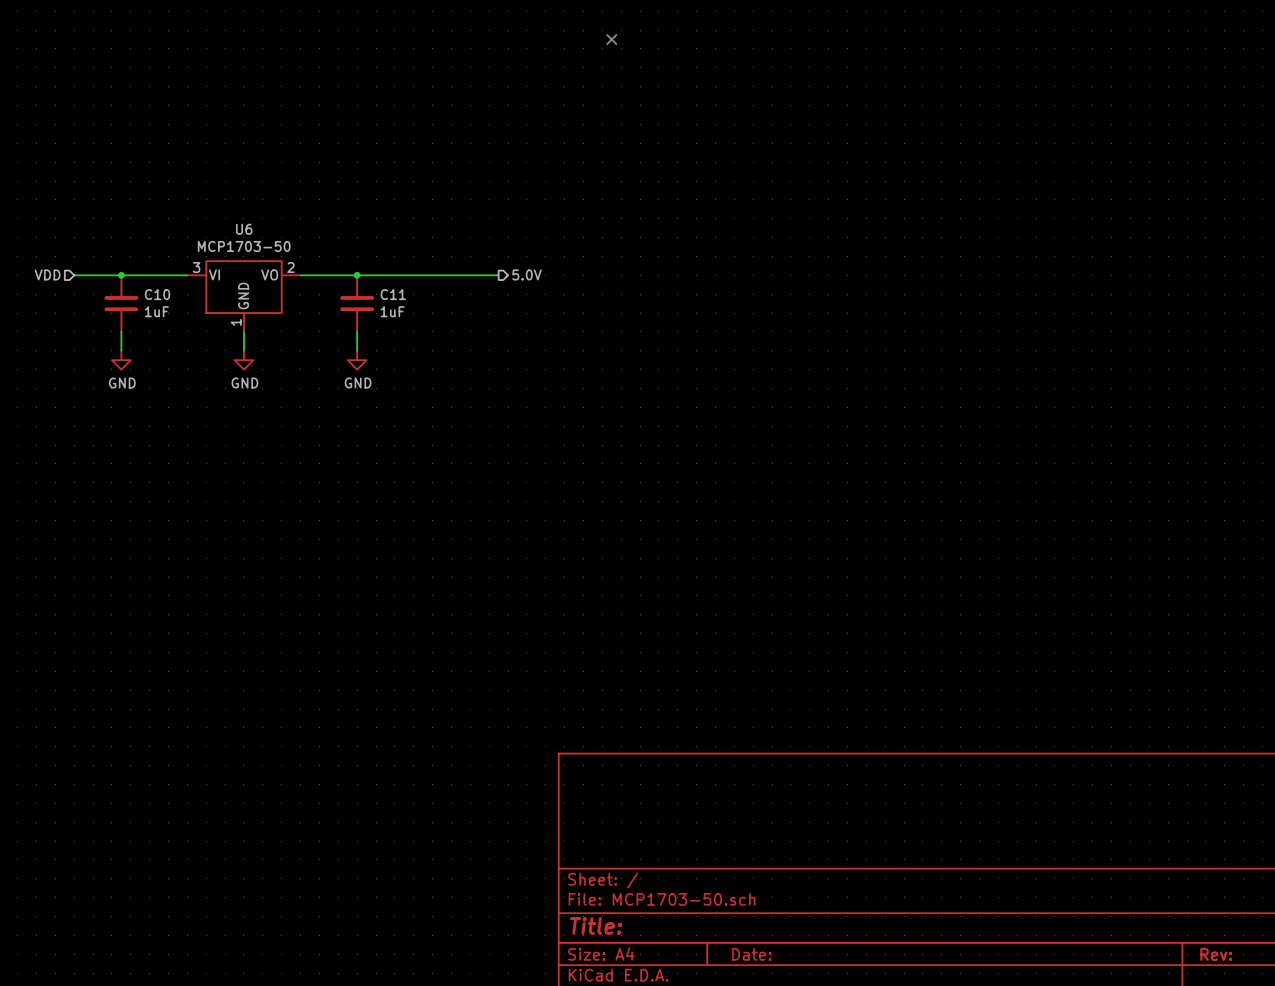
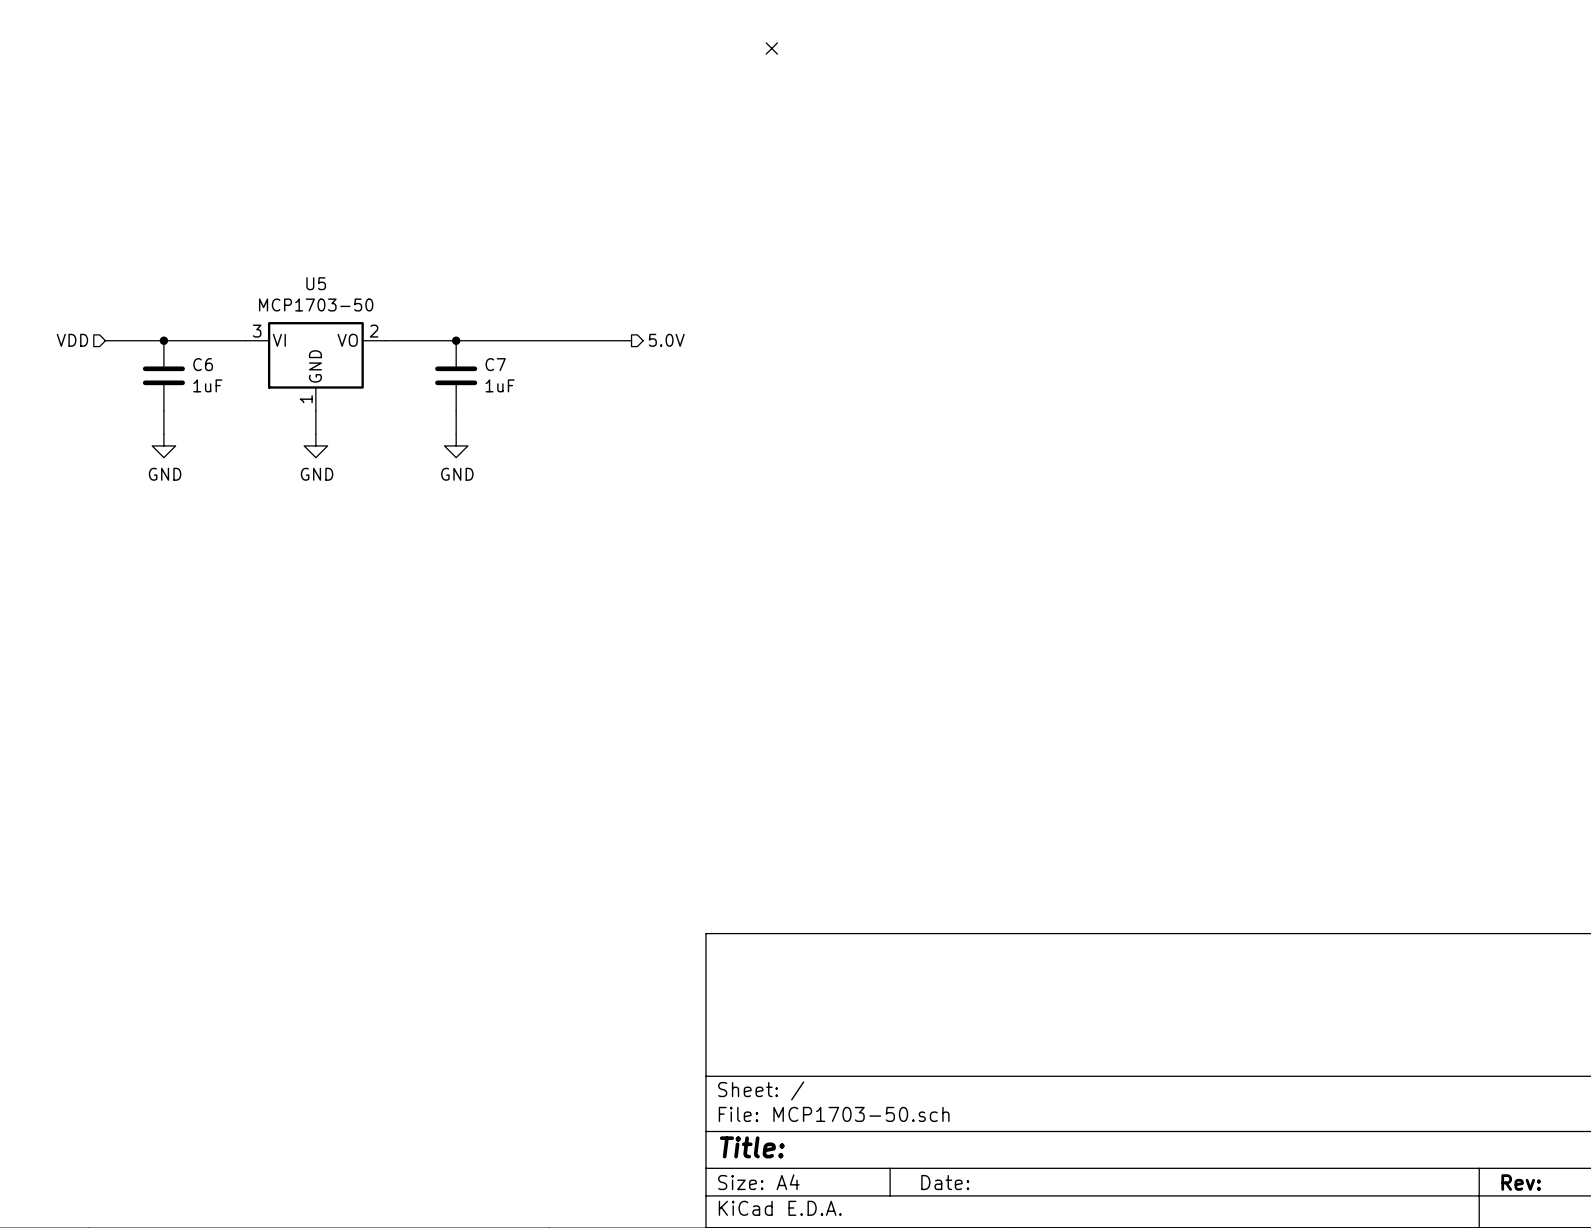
U6 name: U6 (244, 229) -> U5 (316, 283)
C10 name: C10 (157, 294) -> C6 (203, 364)
C11 name: C11 (393, 294) -> C7 (495, 364)

